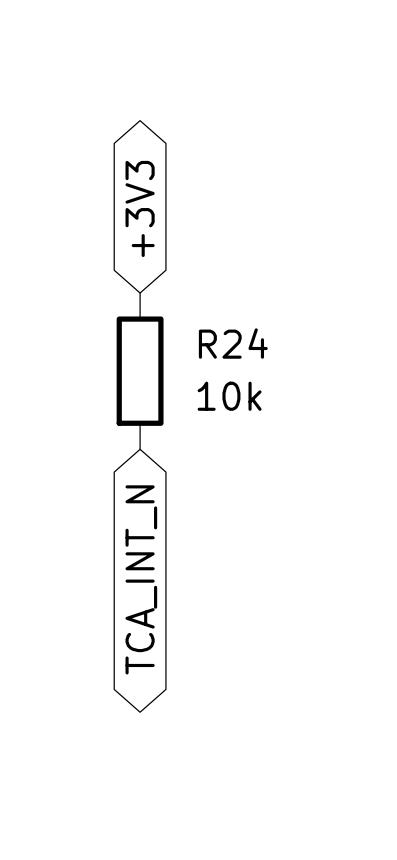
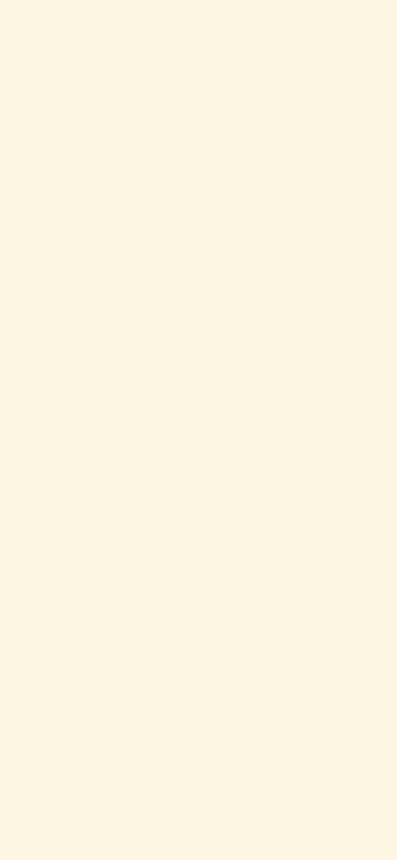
global label: +3V3 (140, 208) -> none
R24: 10k (140, 371) -> none
global label: TCA_INT_N (141, 579) -> none

